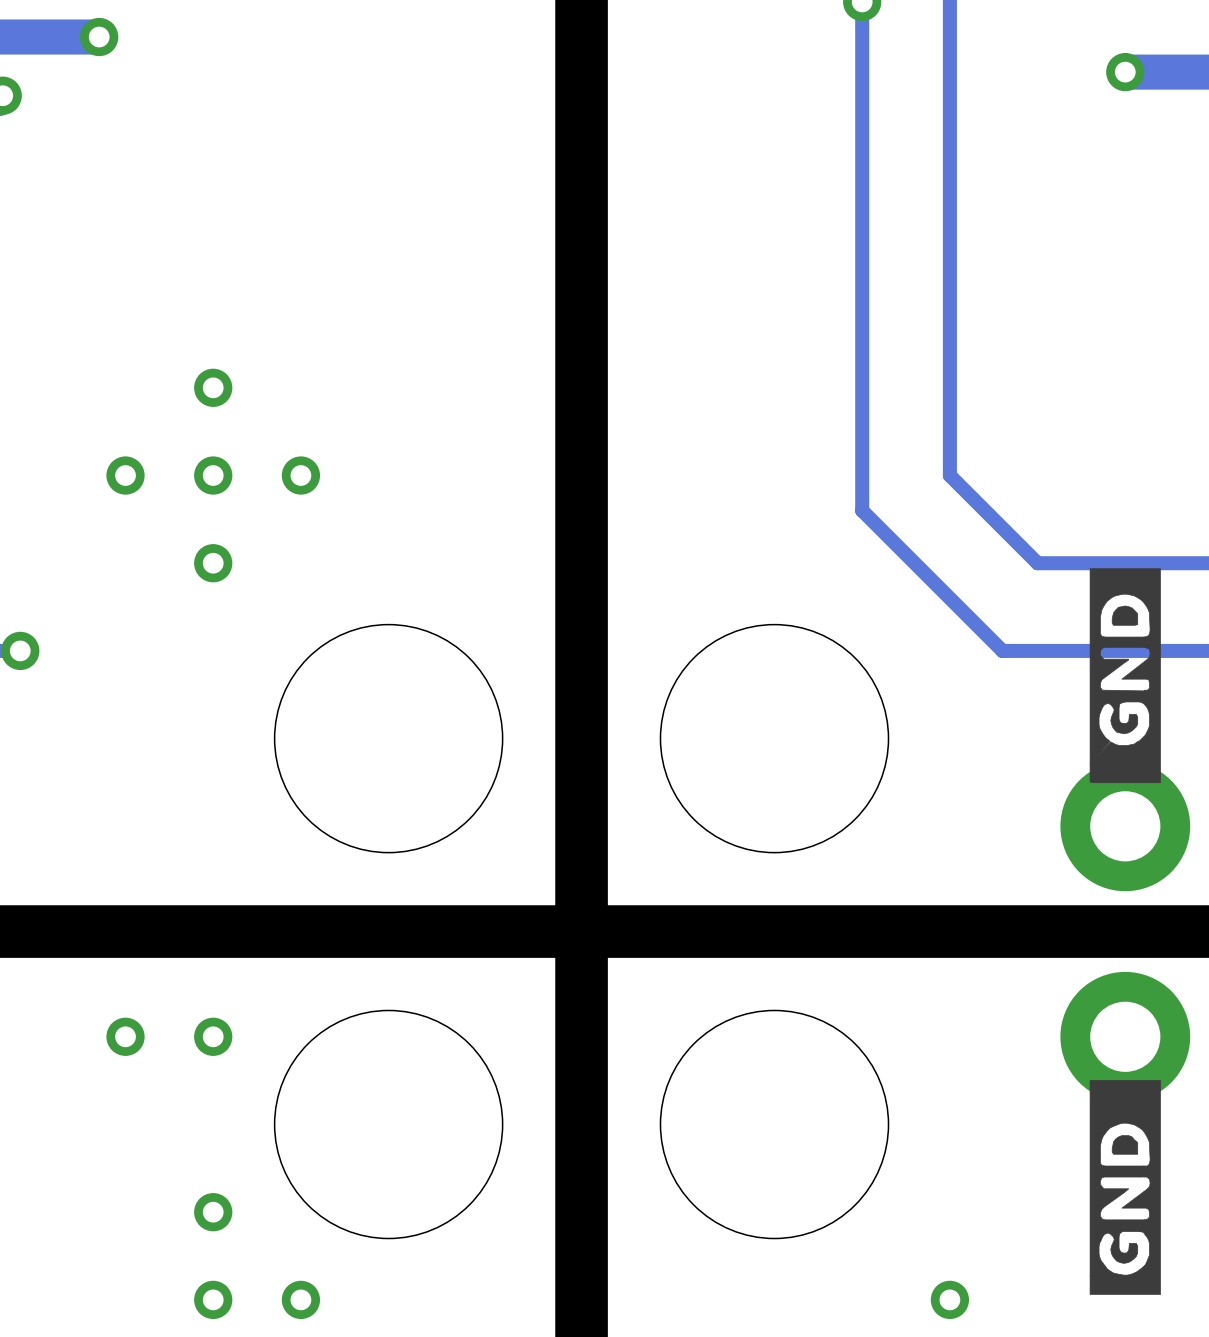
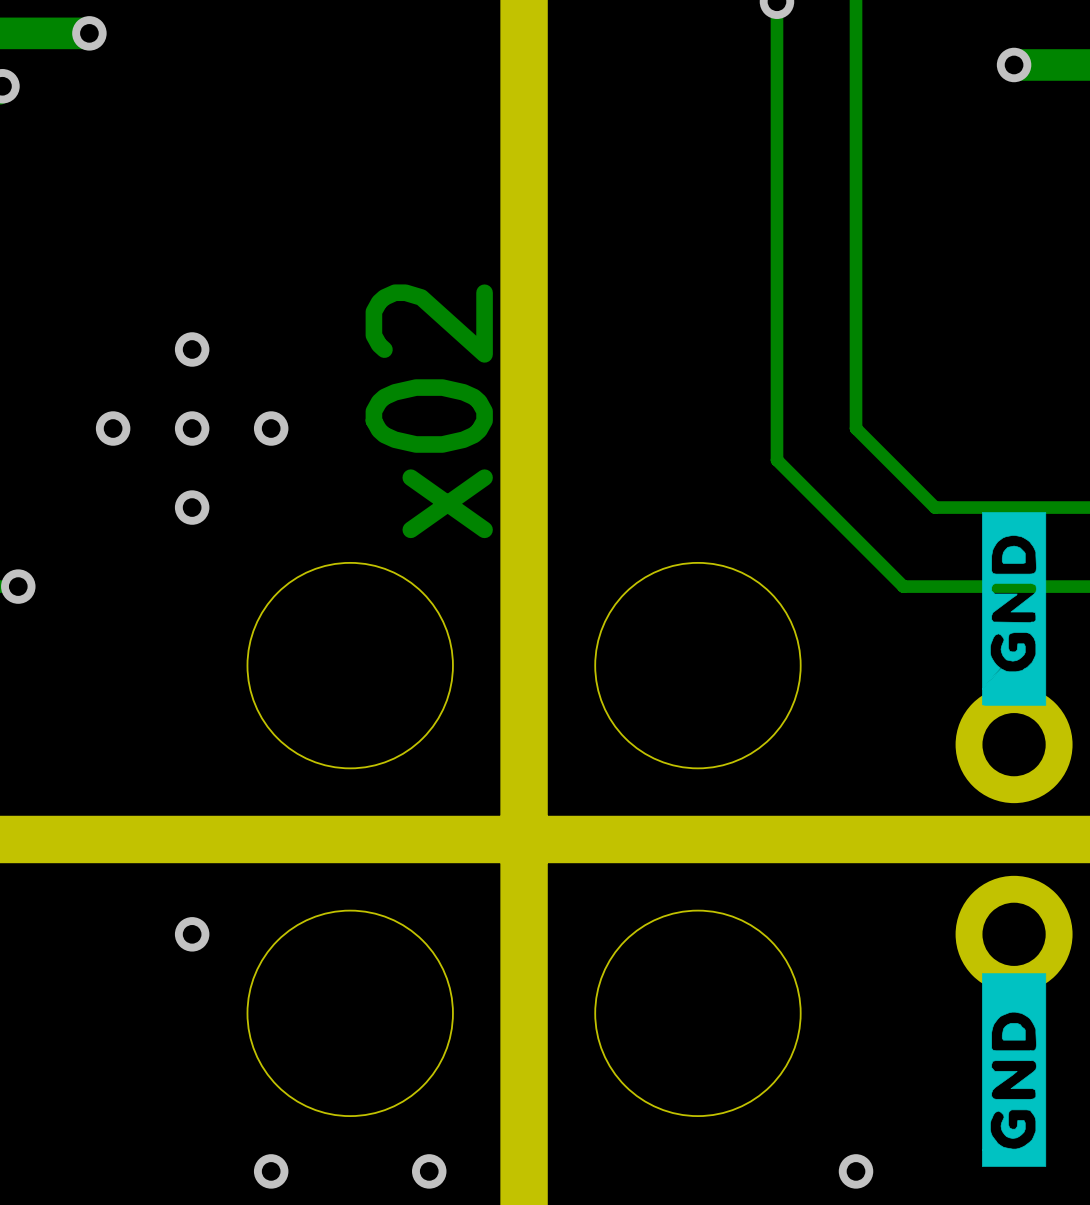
text: none -> x02 (429, 411)
via: (125, 1036) -> none
via: (213, 1212) -> none
via: (213, 1299) -> none
via: none -> (429, 1171)

